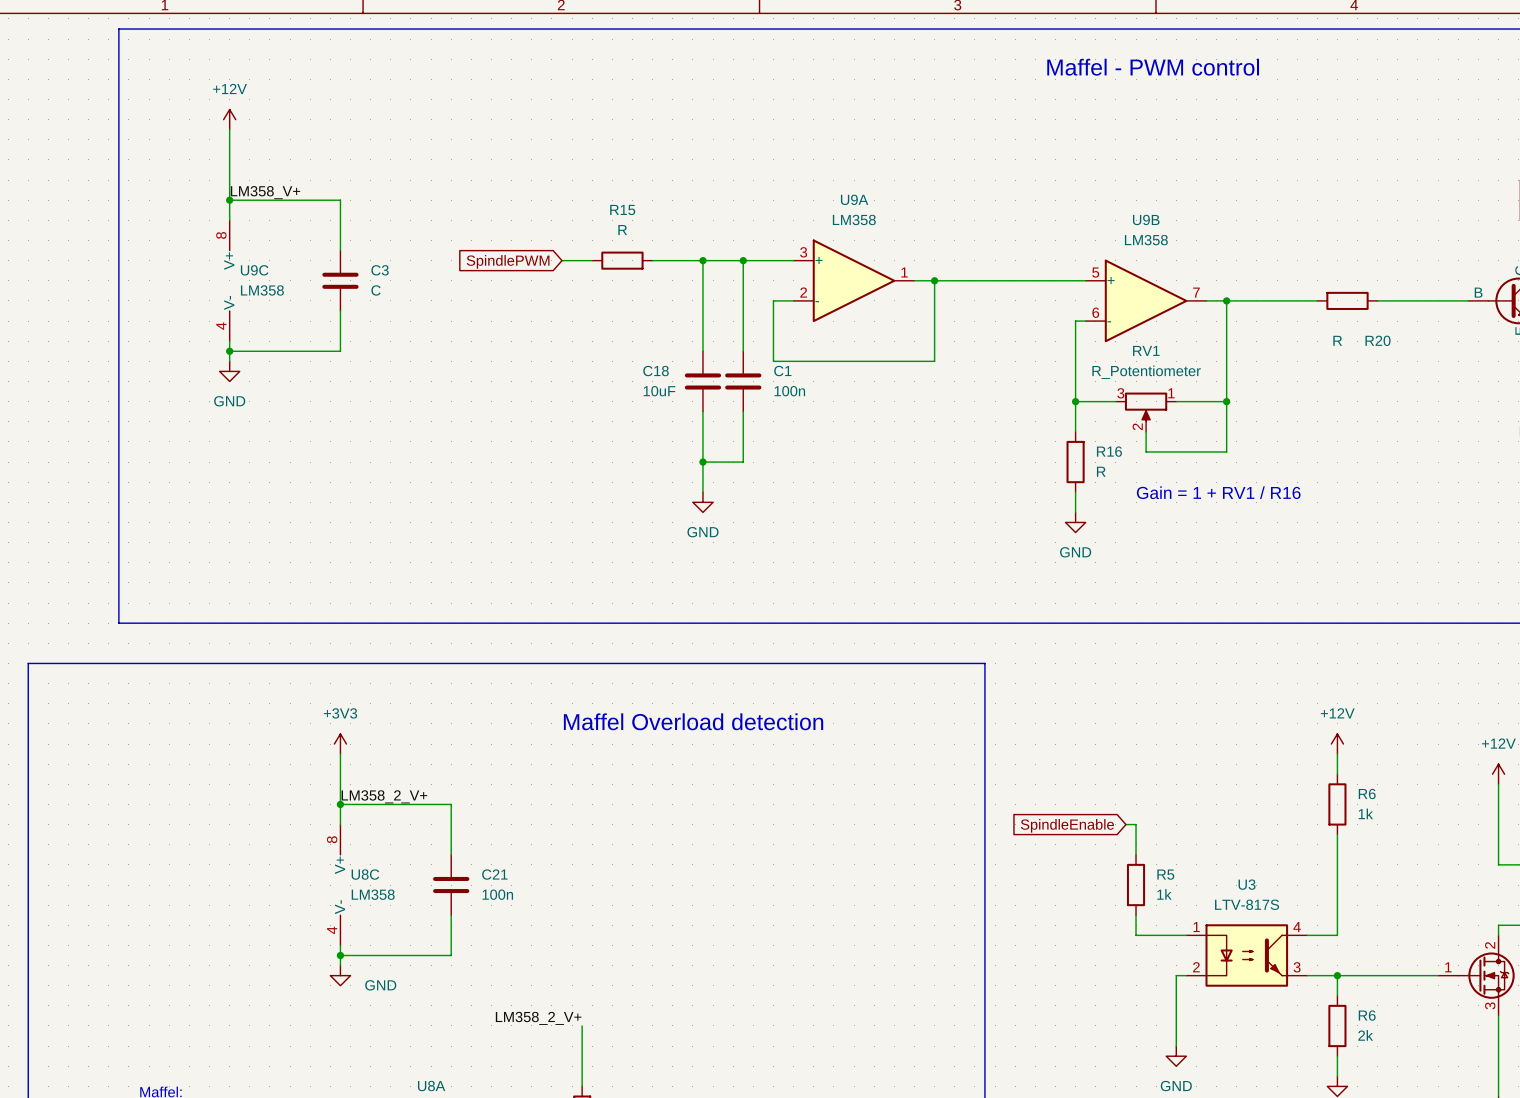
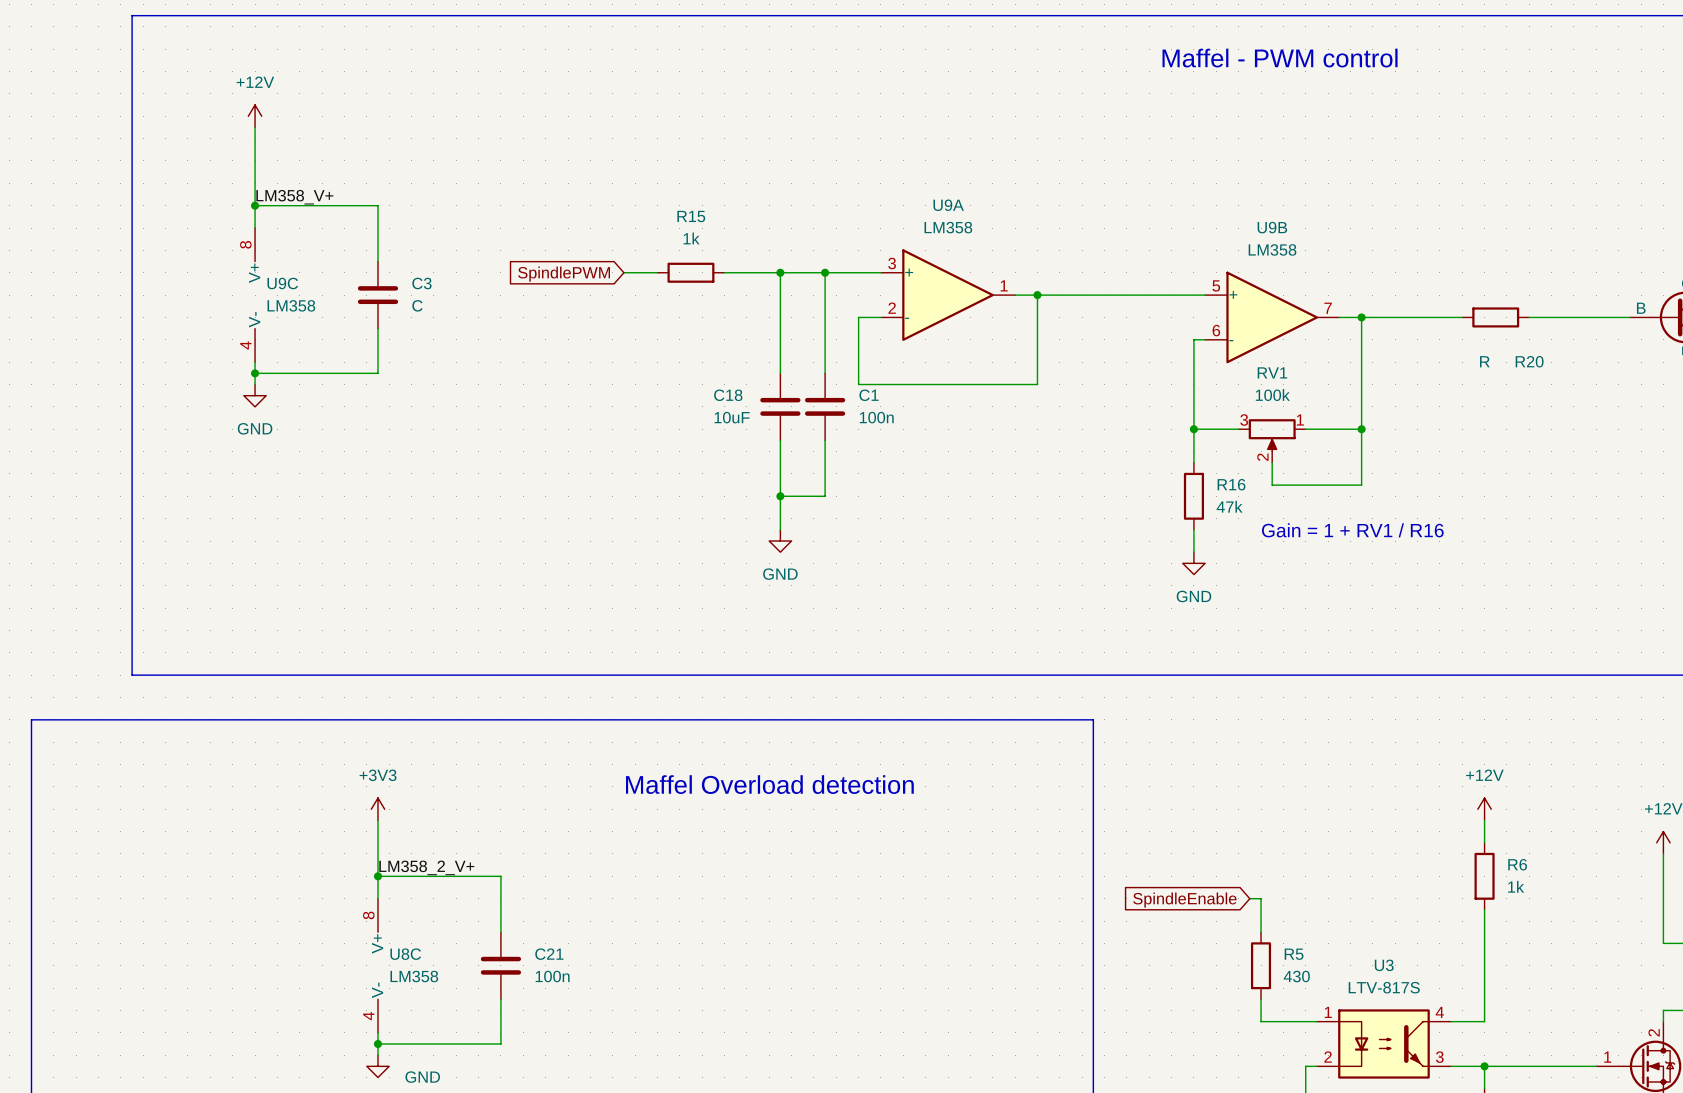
R15 value: R (622, 230) -> 1k (691, 238)
RV1 value: R_Potentiometer (1146, 372) -> 100k (1272, 395)
R16 value: R (1101, 471) -> 47k (1229, 506)
R5 value: 1k (1164, 894) -> 430 (1296, 976)

